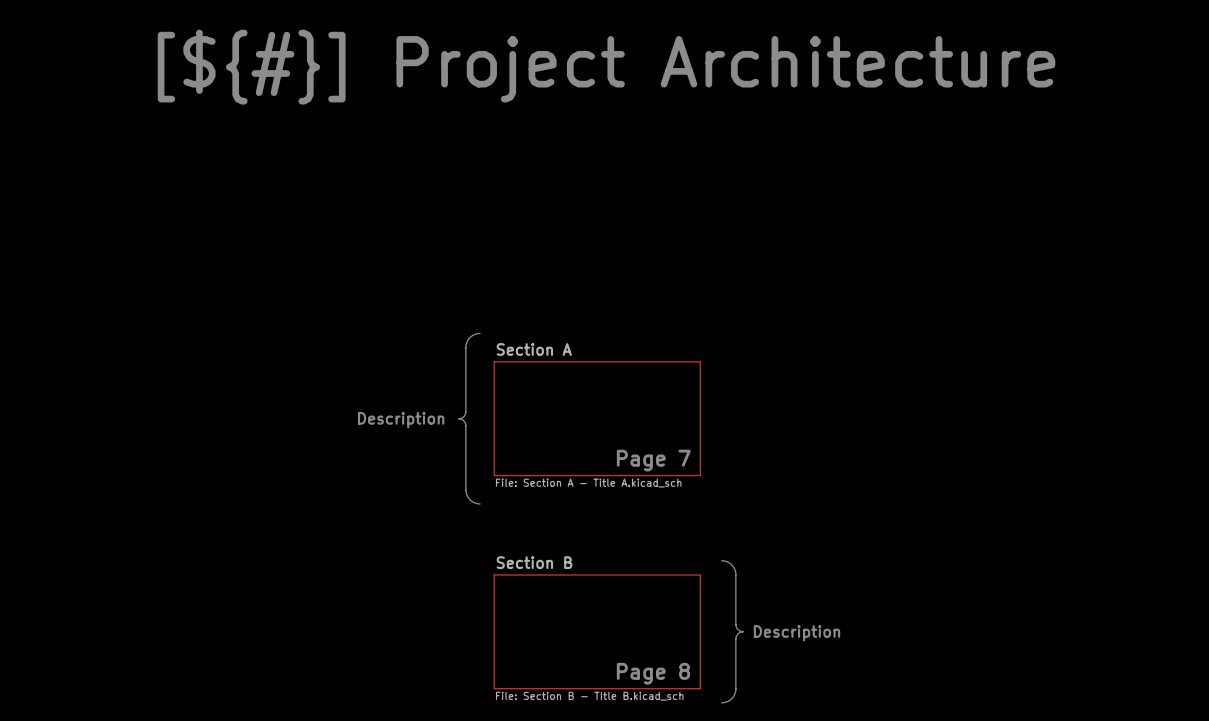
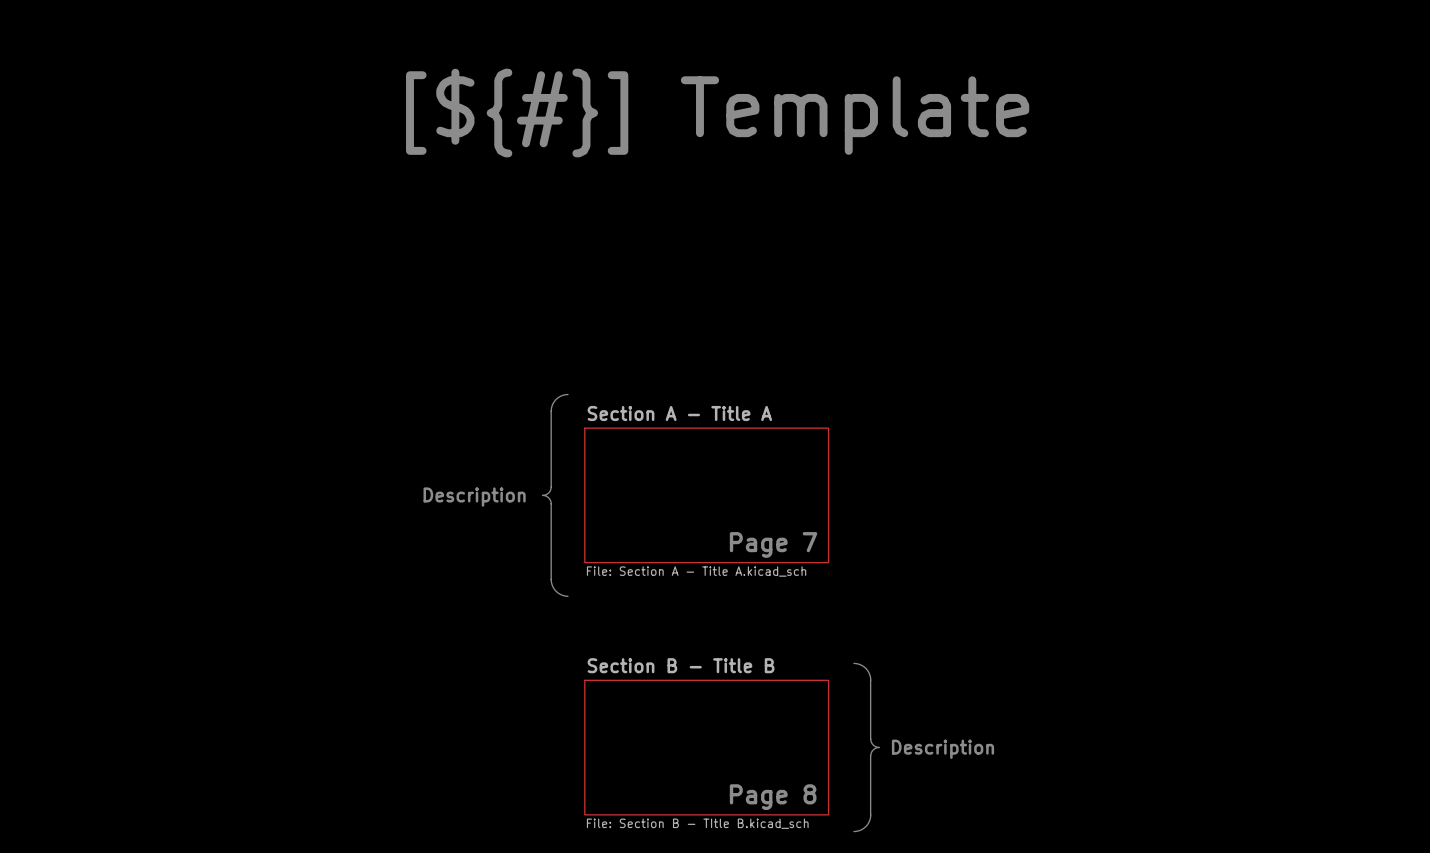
text: [${#}] Project Architecture (606, 67) -> none
text: none -> [${#}] Template (717, 113)
sheet Section A name: Section A (534, 349) -> Section A - Title A (679, 413)
sheet Section B name: Section B (534, 562) -> Section B - Title B (681, 665)

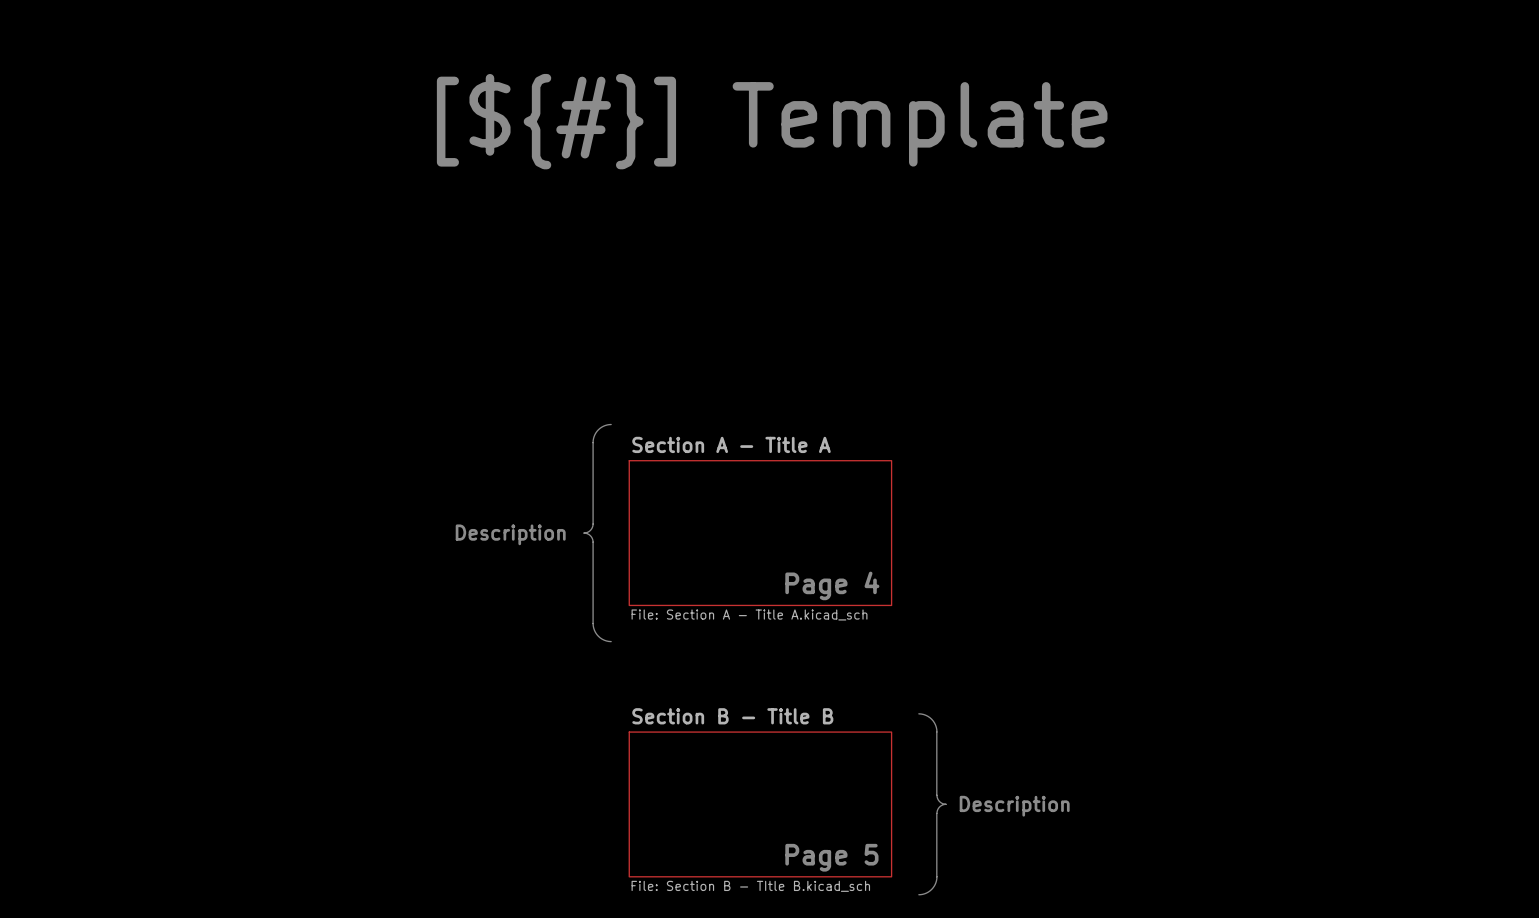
text: Page 7 (773, 544) -> Page 4 (832, 585)
text: Page 8 (773, 797) -> Page 5 (831, 857)

